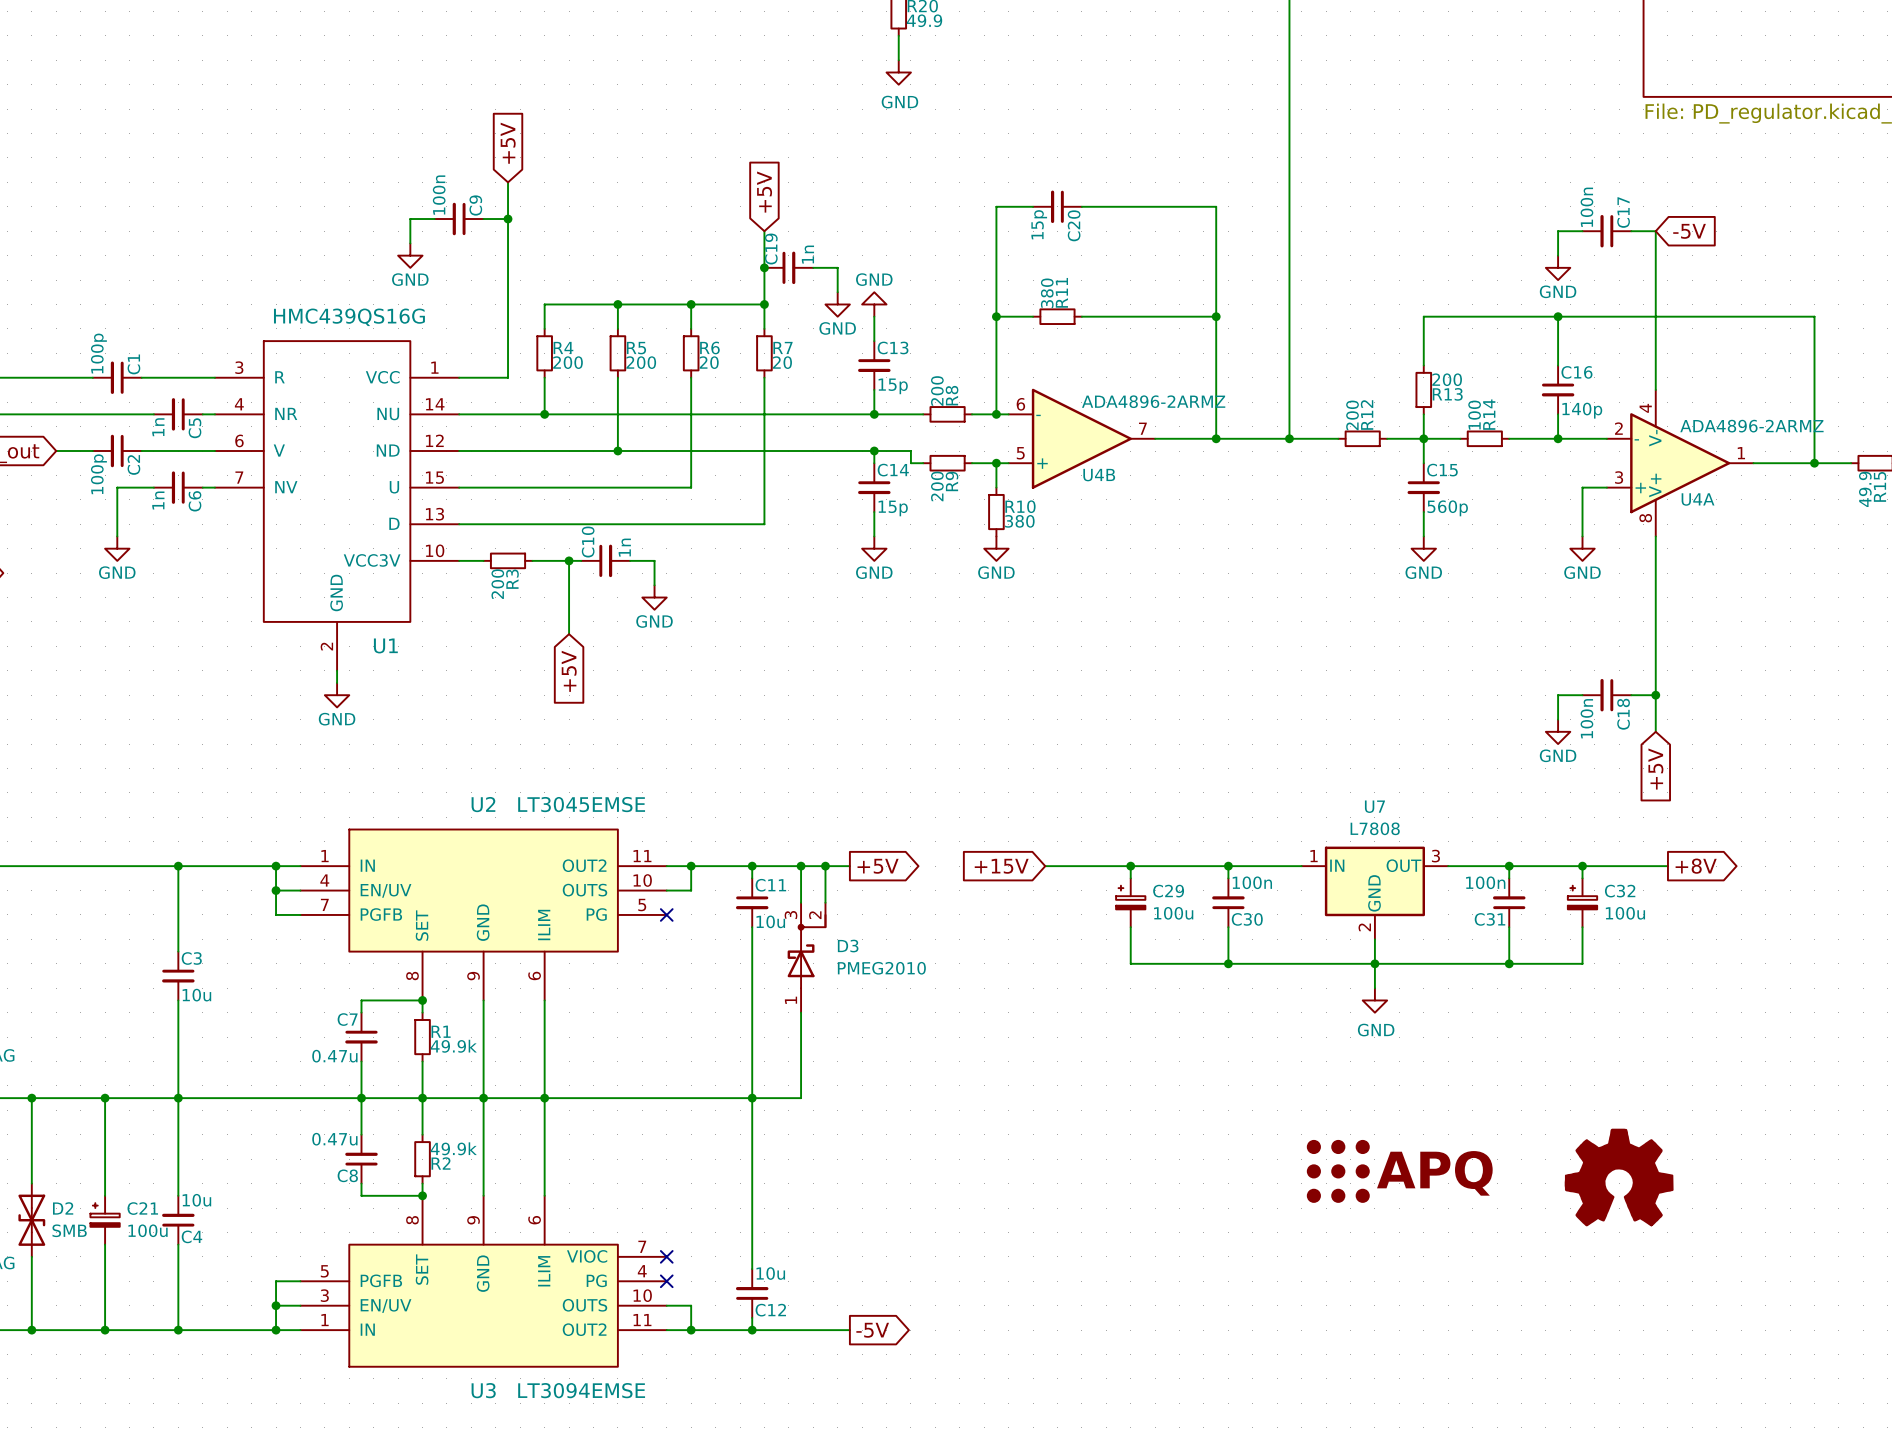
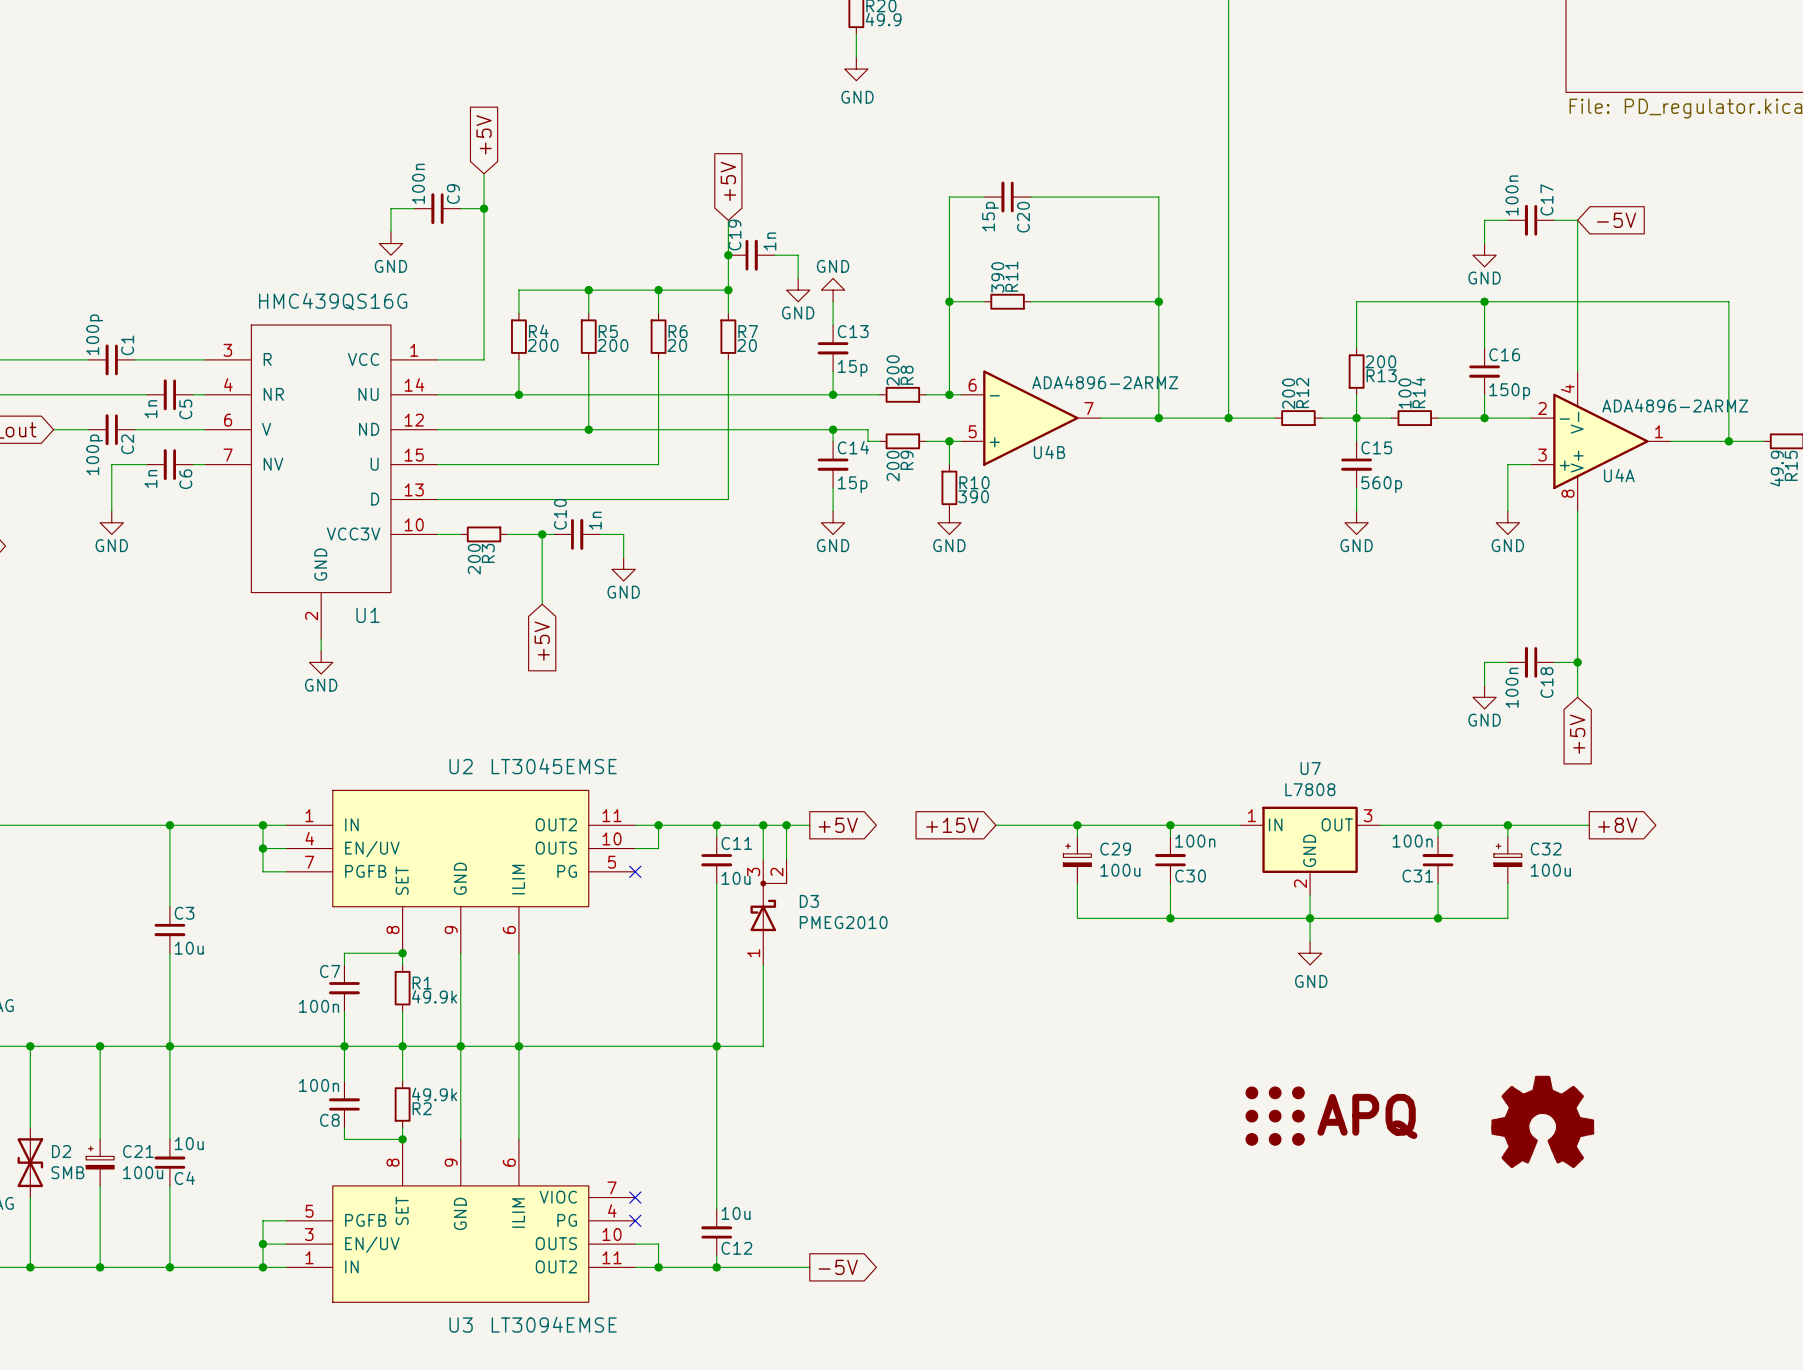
R11 value: 380 (1047, 293) -> 390 (997, 277)
C16 value: 140p (1582, 410) -> 150p (1509, 391)
R10 value: 380 (1019, 521) -> 390 (973, 496)
C7 value: 0.47u (334, 1056) -> 100n (319, 1006)
C8 value: 0.47u (334, 1139) -> 100n (319, 1085)

